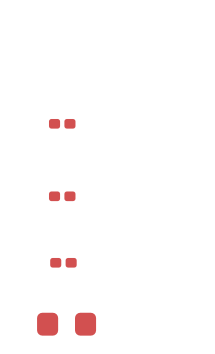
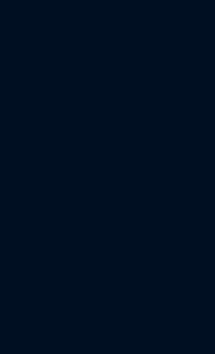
part: (62, 123) -> none
part: (62, 196) -> none
part: (63, 262) -> none
part: (66, 324) -> none

